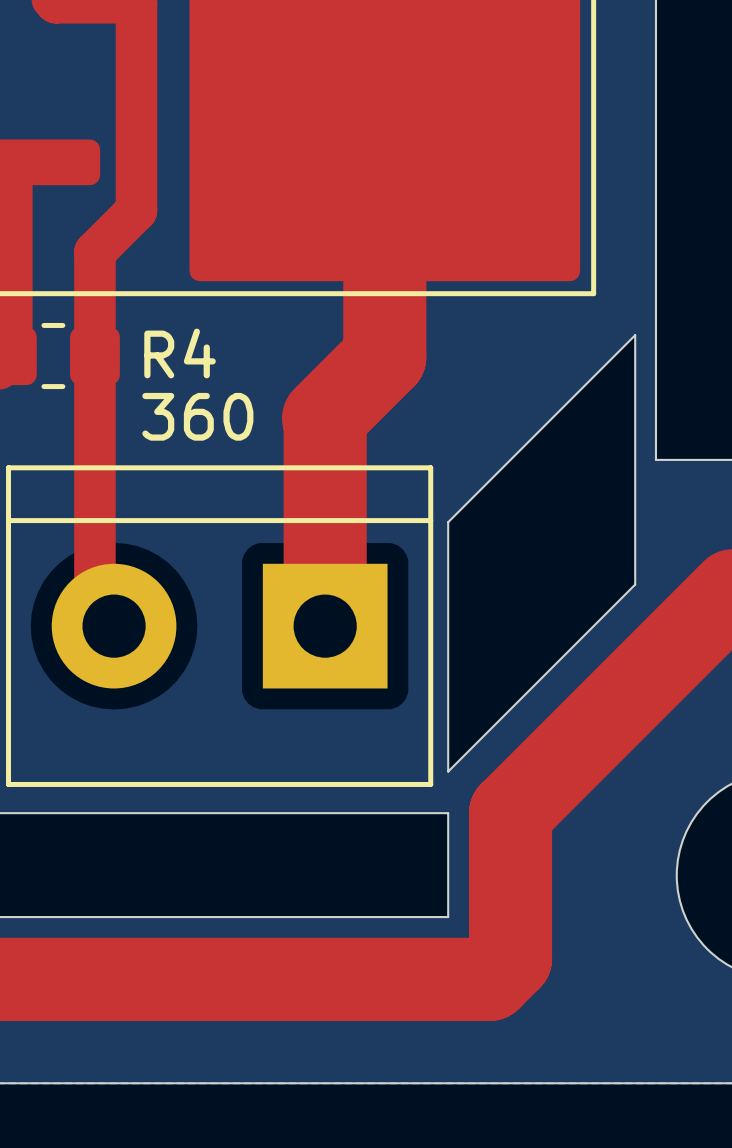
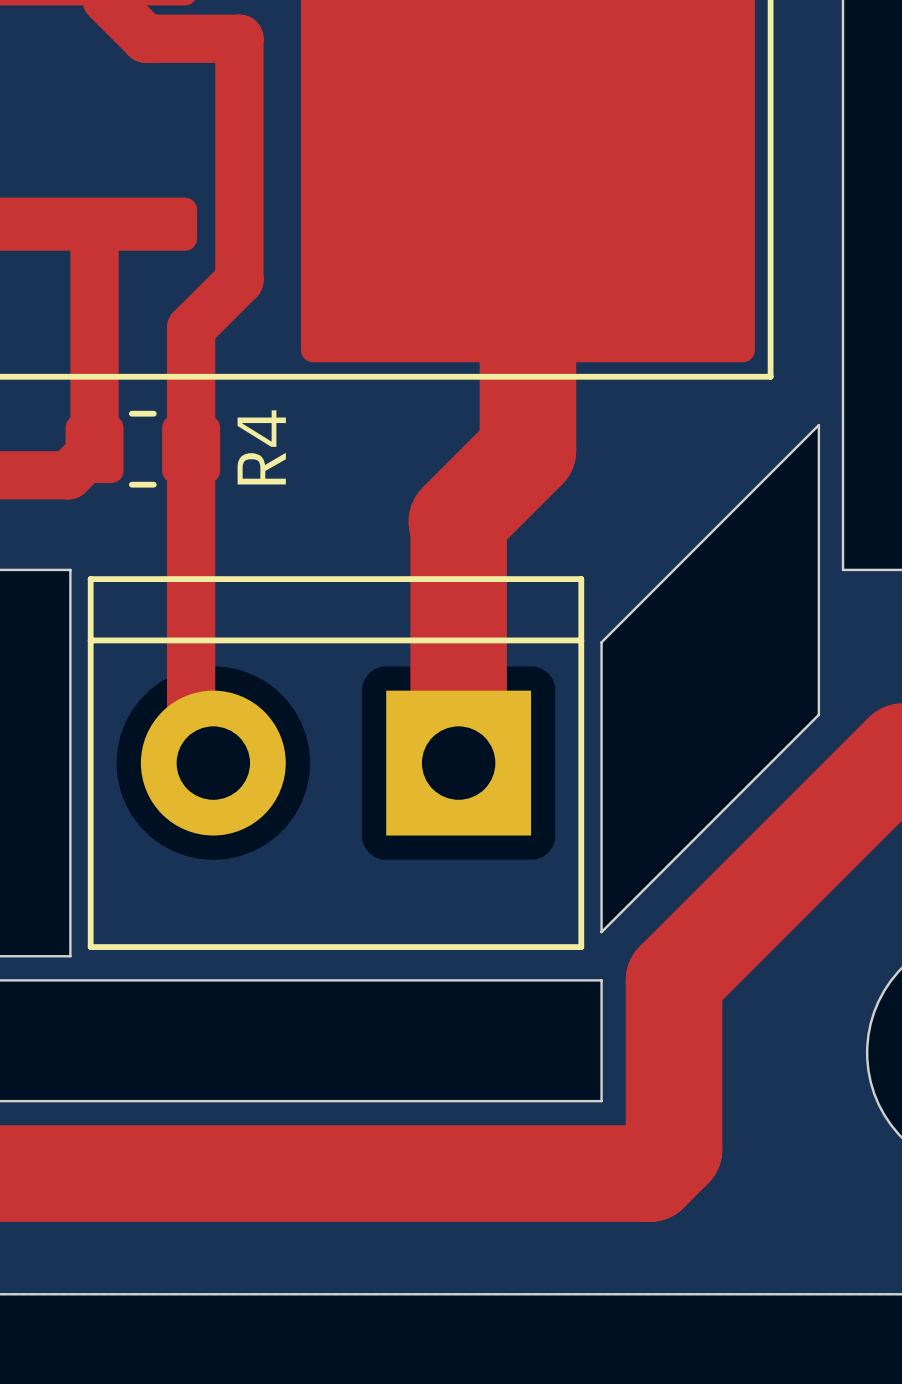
R4 name rotation: 0° (180, 353) -> 90° counterclockwise (261, 447)
R4 value: 360 (197, 416) -> none

